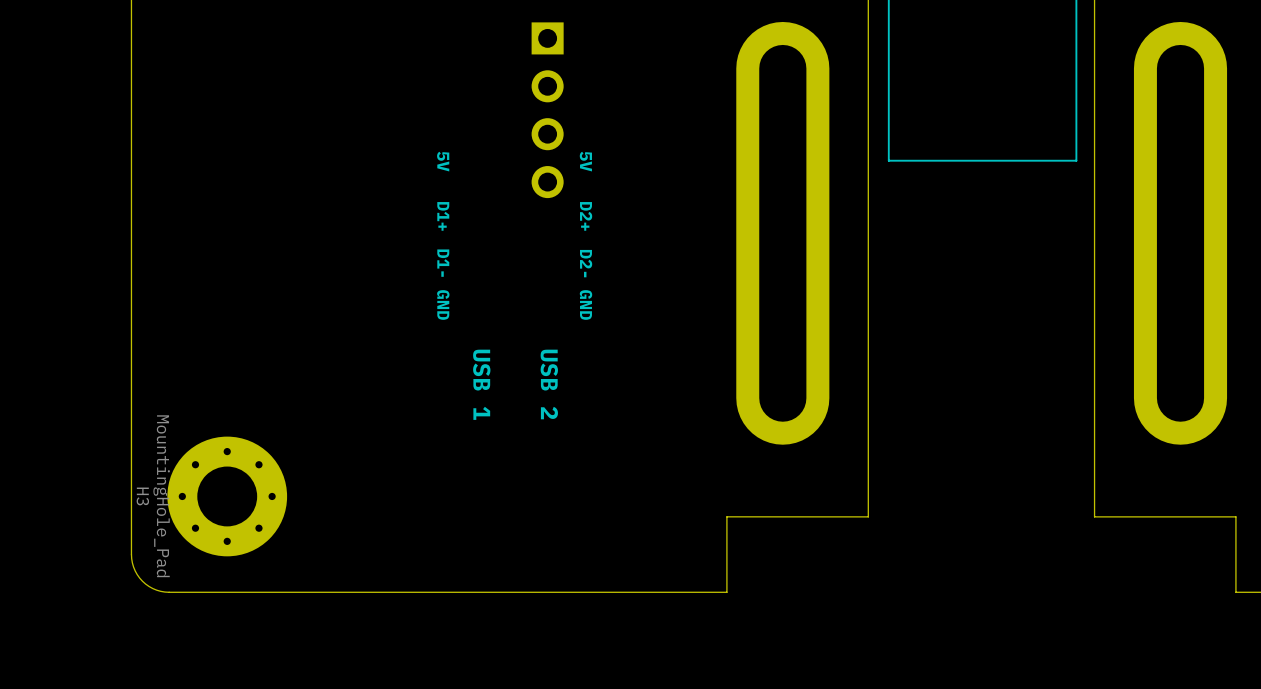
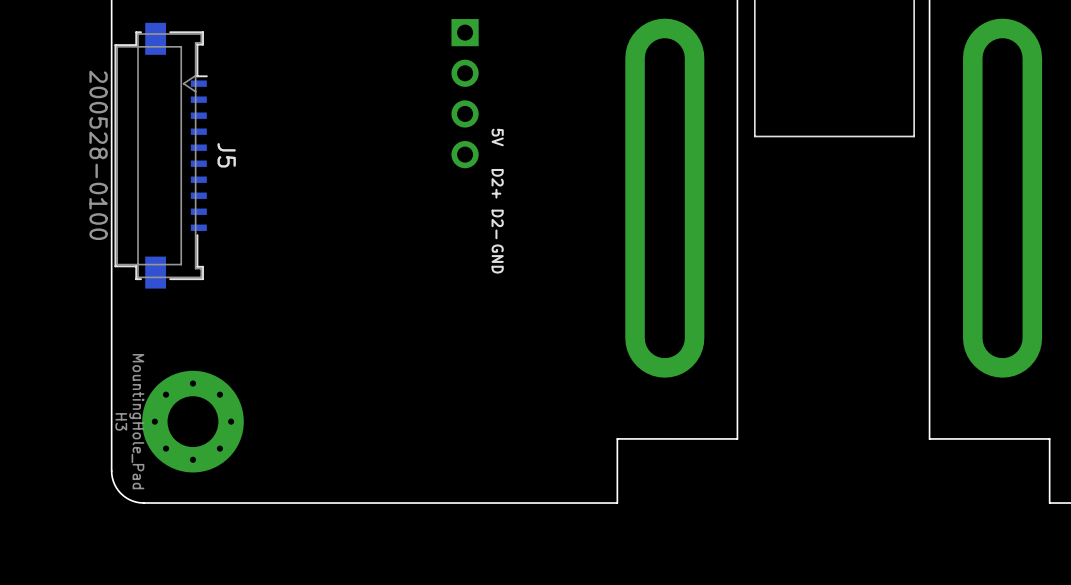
text: 5V (443, 161) -> none
J5: none -> 200528-0100 (161, 155)
text: D1+ (443, 216) -> none
text: D1- (443, 263) -> none
text: GND (443, 304) -> none
text: USB 1 (481, 384) -> none
text: USB 2 (549, 384) -> none

